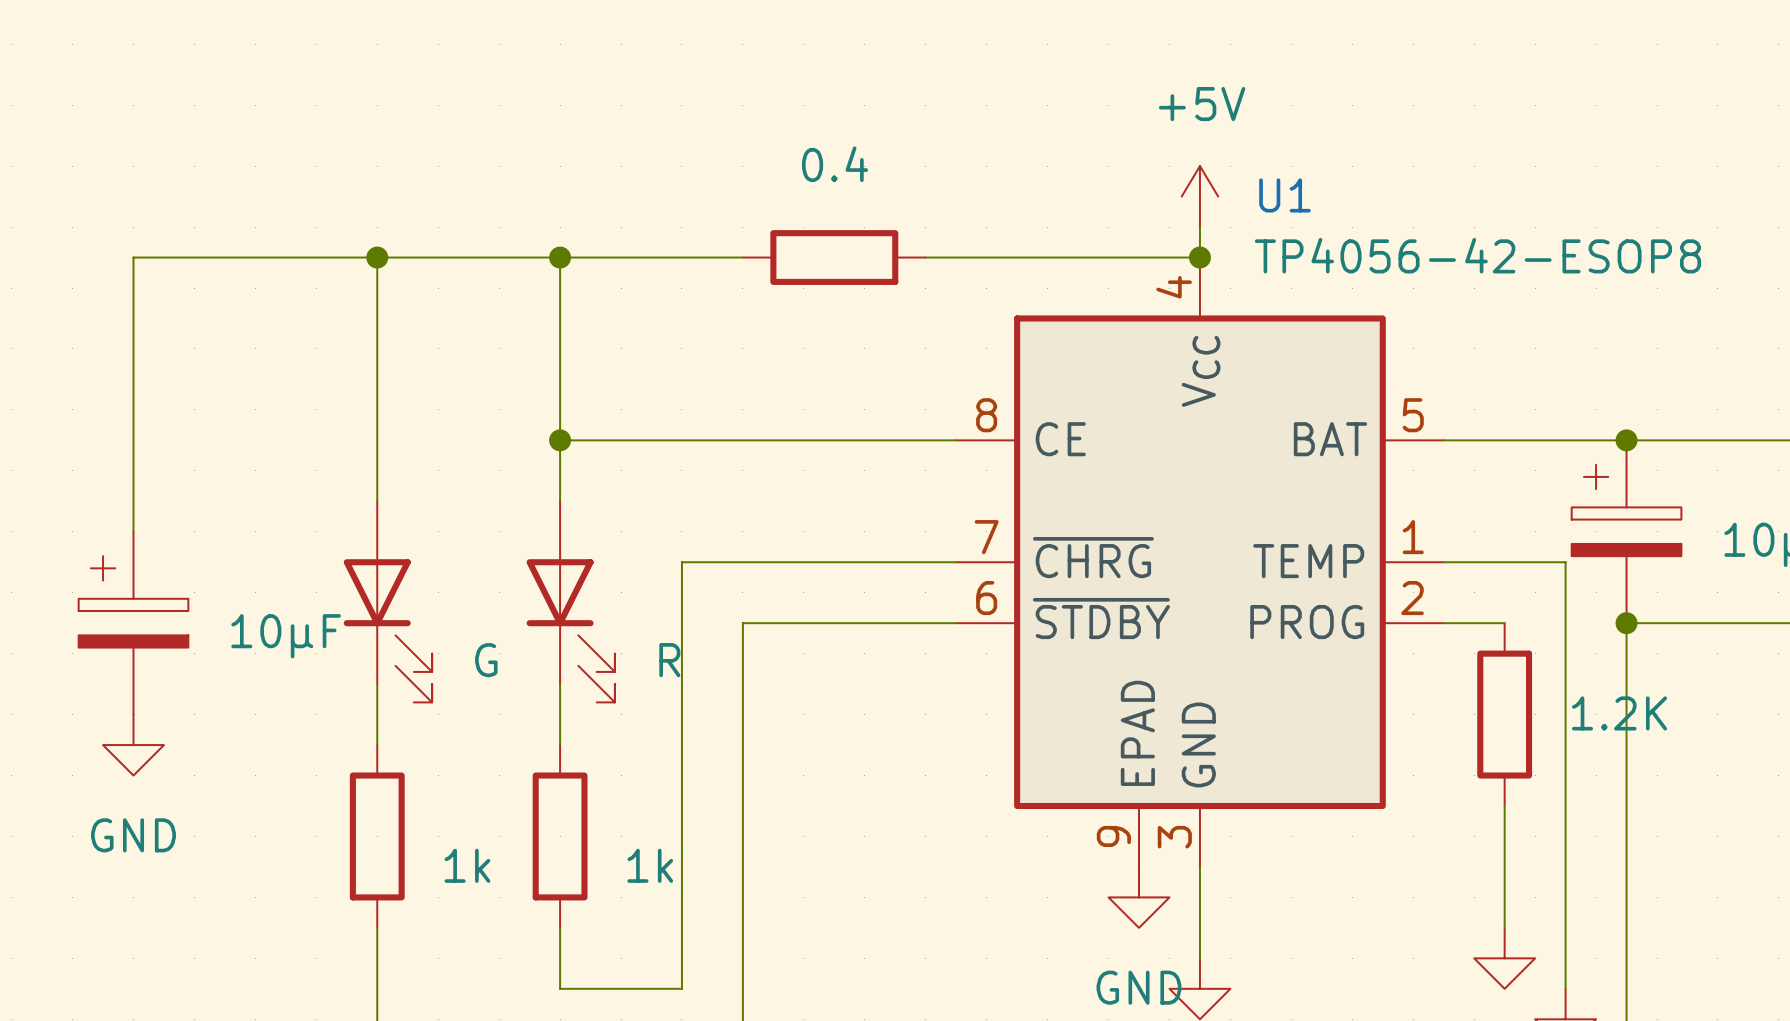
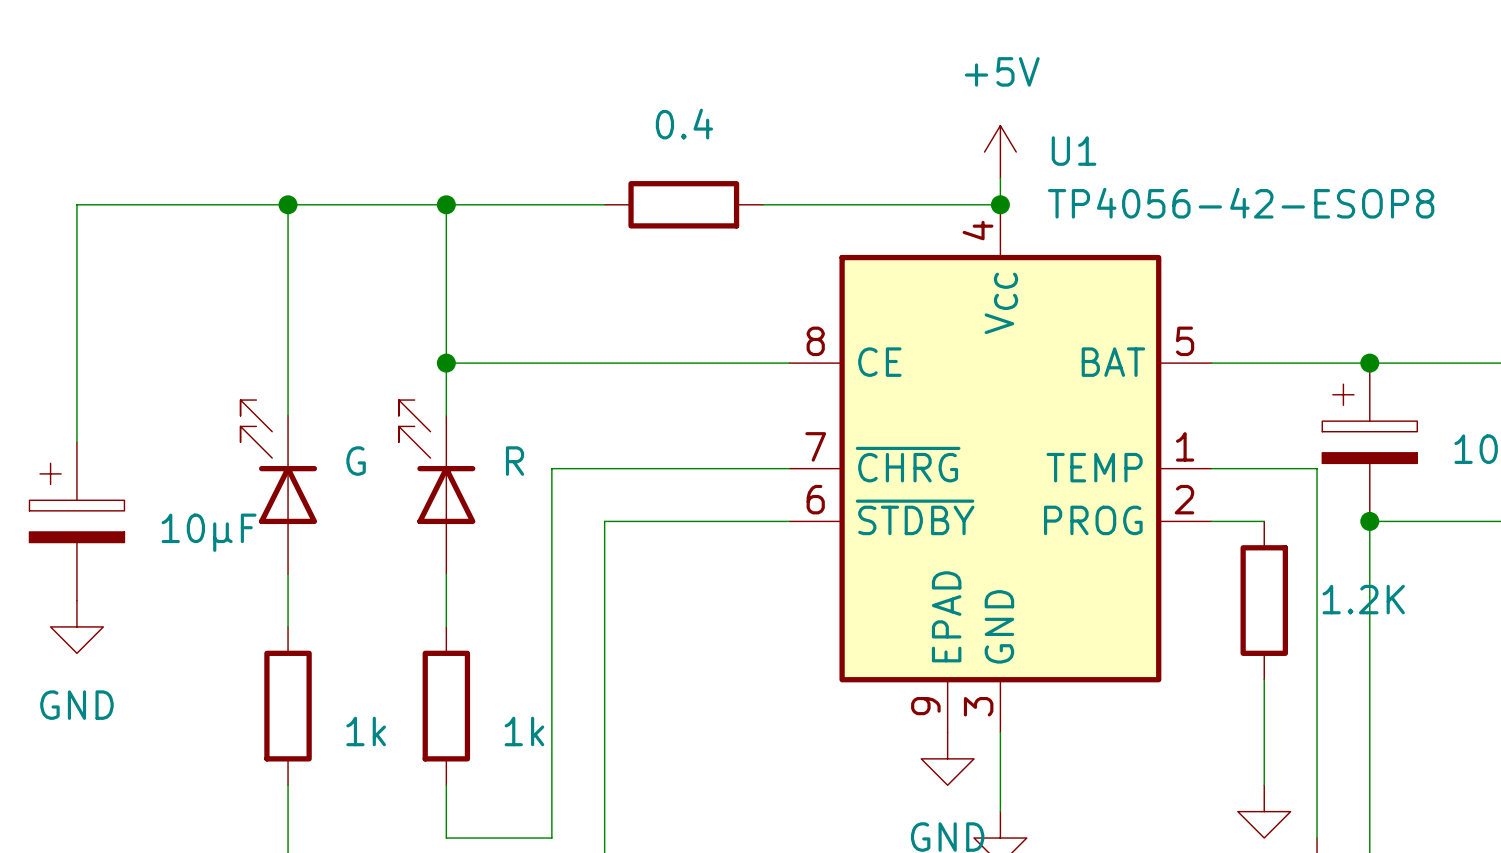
part rotation: 0° (387, 630) -> 180° (278, 462)
part rotation: 0° (570, 630) -> 180° (437, 462)
part value position: G (486, 660) -> G (356, 461)
part value position: R (669, 660) -> R (515, 461)

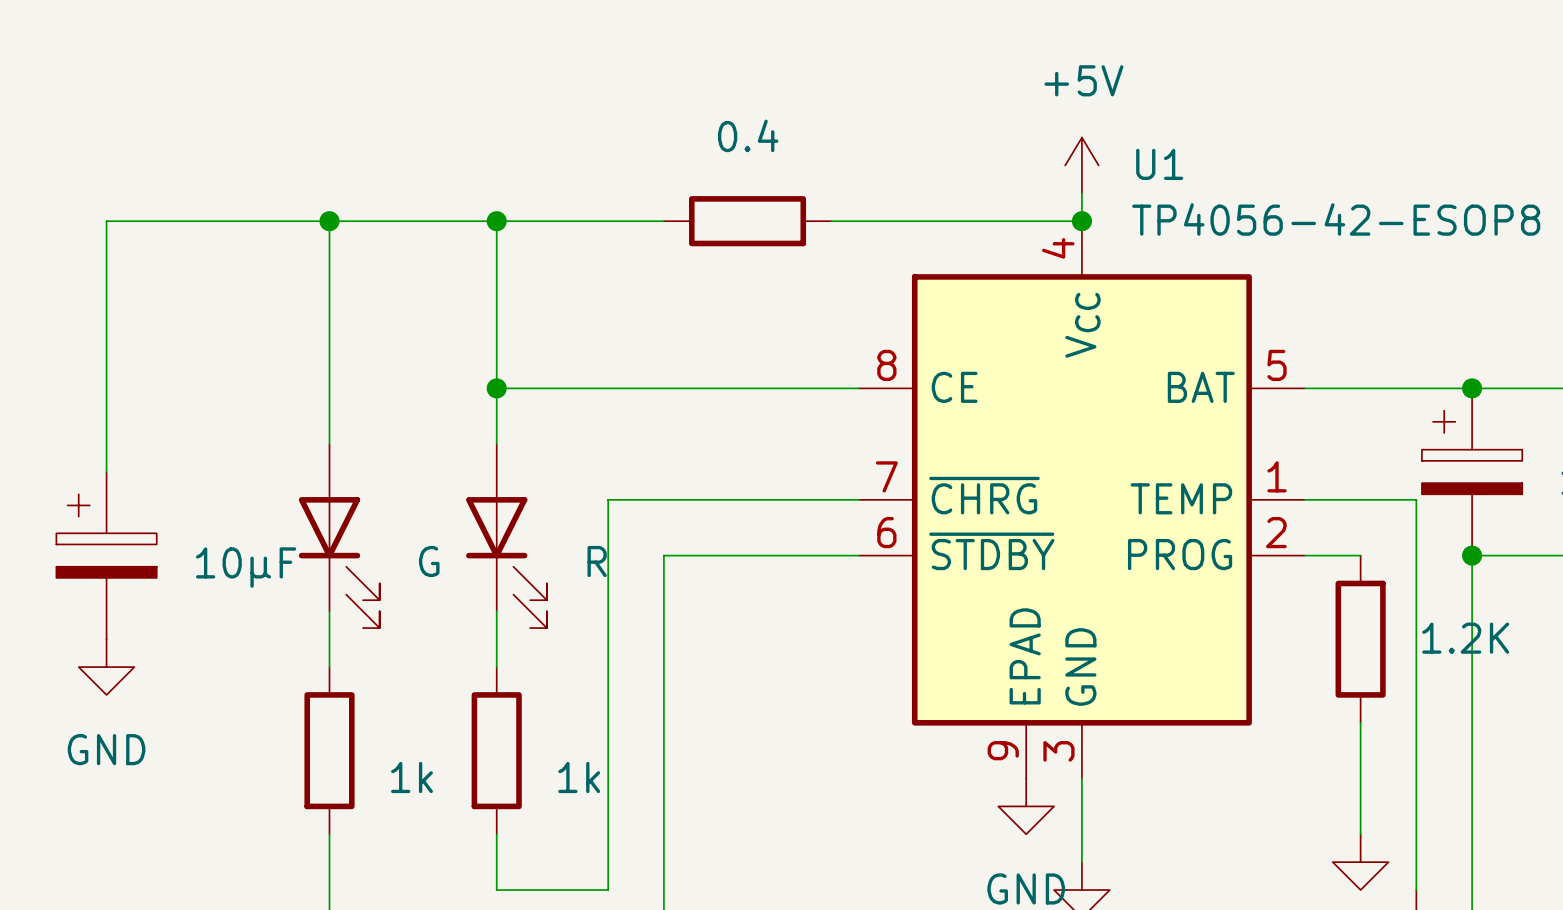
part value position: G (356, 461) -> G (429, 561)
part value position: R (515, 461) -> R (597, 561)
part rotation: 0° (278, 462) -> 180° (339, 562)
part rotation: 0° (437, 462) -> 180° (506, 562)

